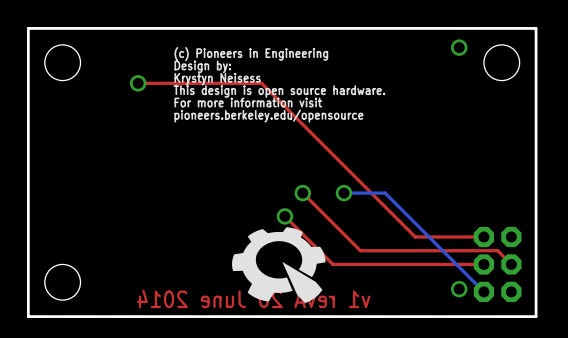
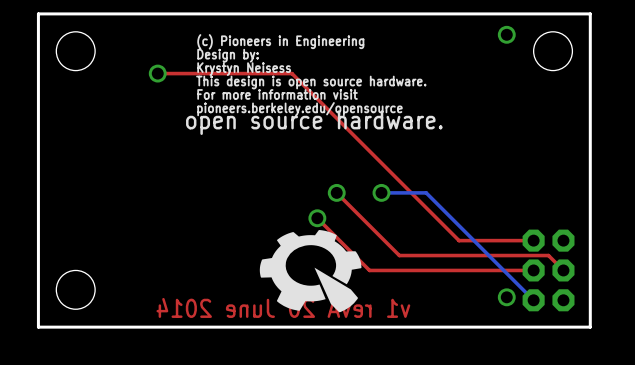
text: none -> open source hardware. (314, 122)

